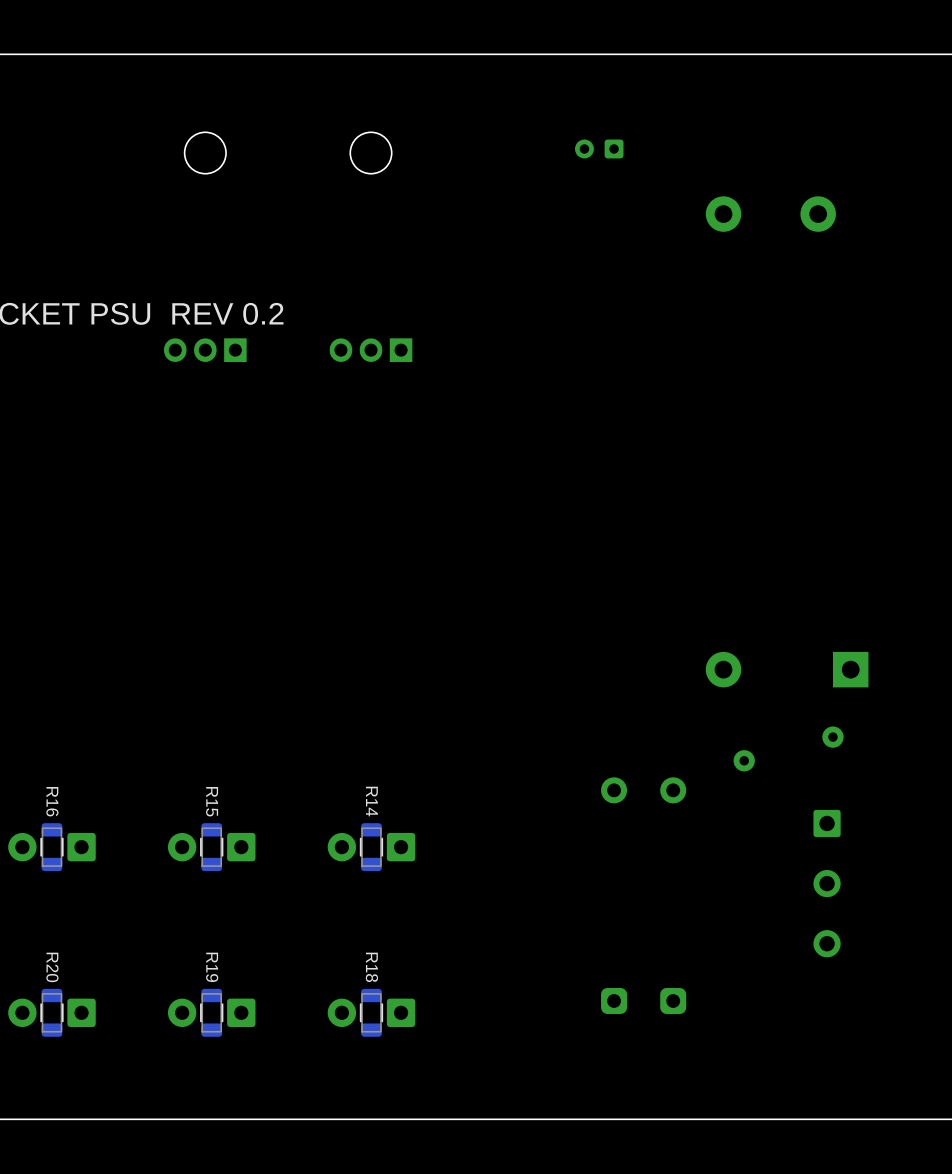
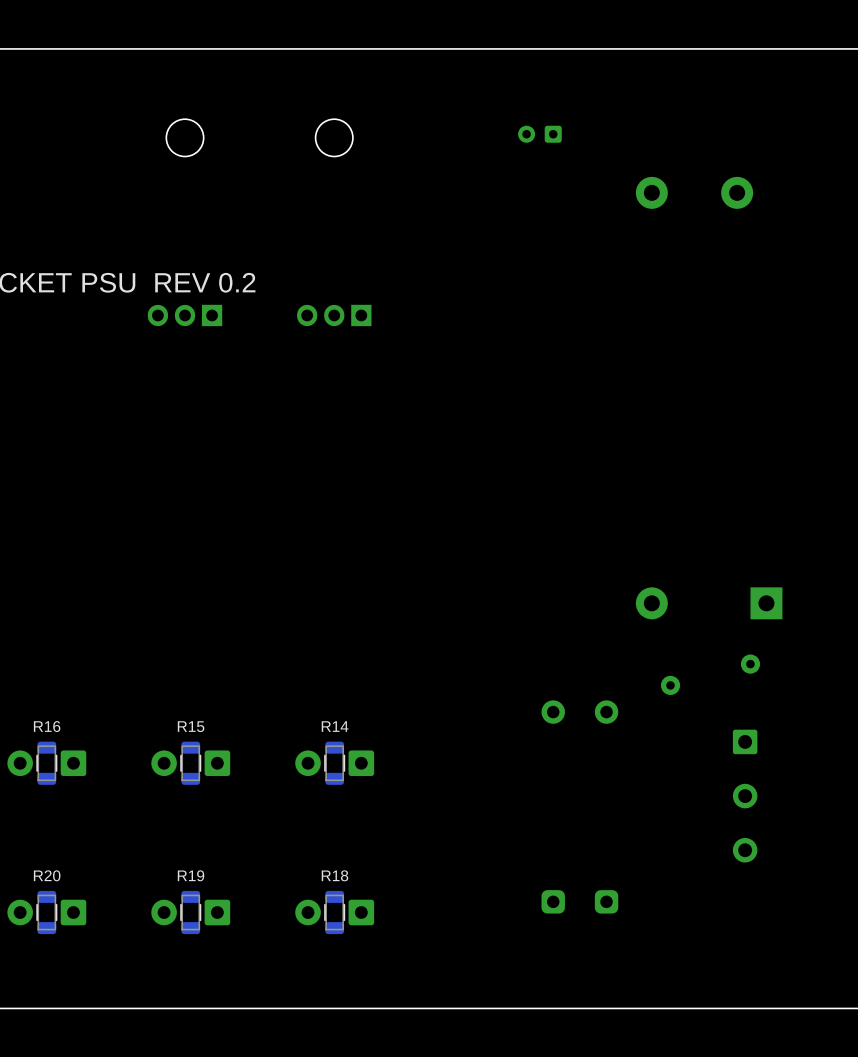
R16 name rotation: 0° (52, 801) -> 90° counterclockwise (47, 726)
R15 name rotation: 0° (212, 801) -> 90° counterclockwise (191, 726)
R14 name rotation: 0° (371, 801) -> 90° counterclockwise (335, 726)
R20 name rotation: 0° (52, 967) -> 90° counterclockwise (47, 875)
R19 name rotation: 0° (212, 967) -> 90° counterclockwise (191, 875)
R18 name rotation: 0° (371, 967) -> 90° counterclockwise (334, 875)

